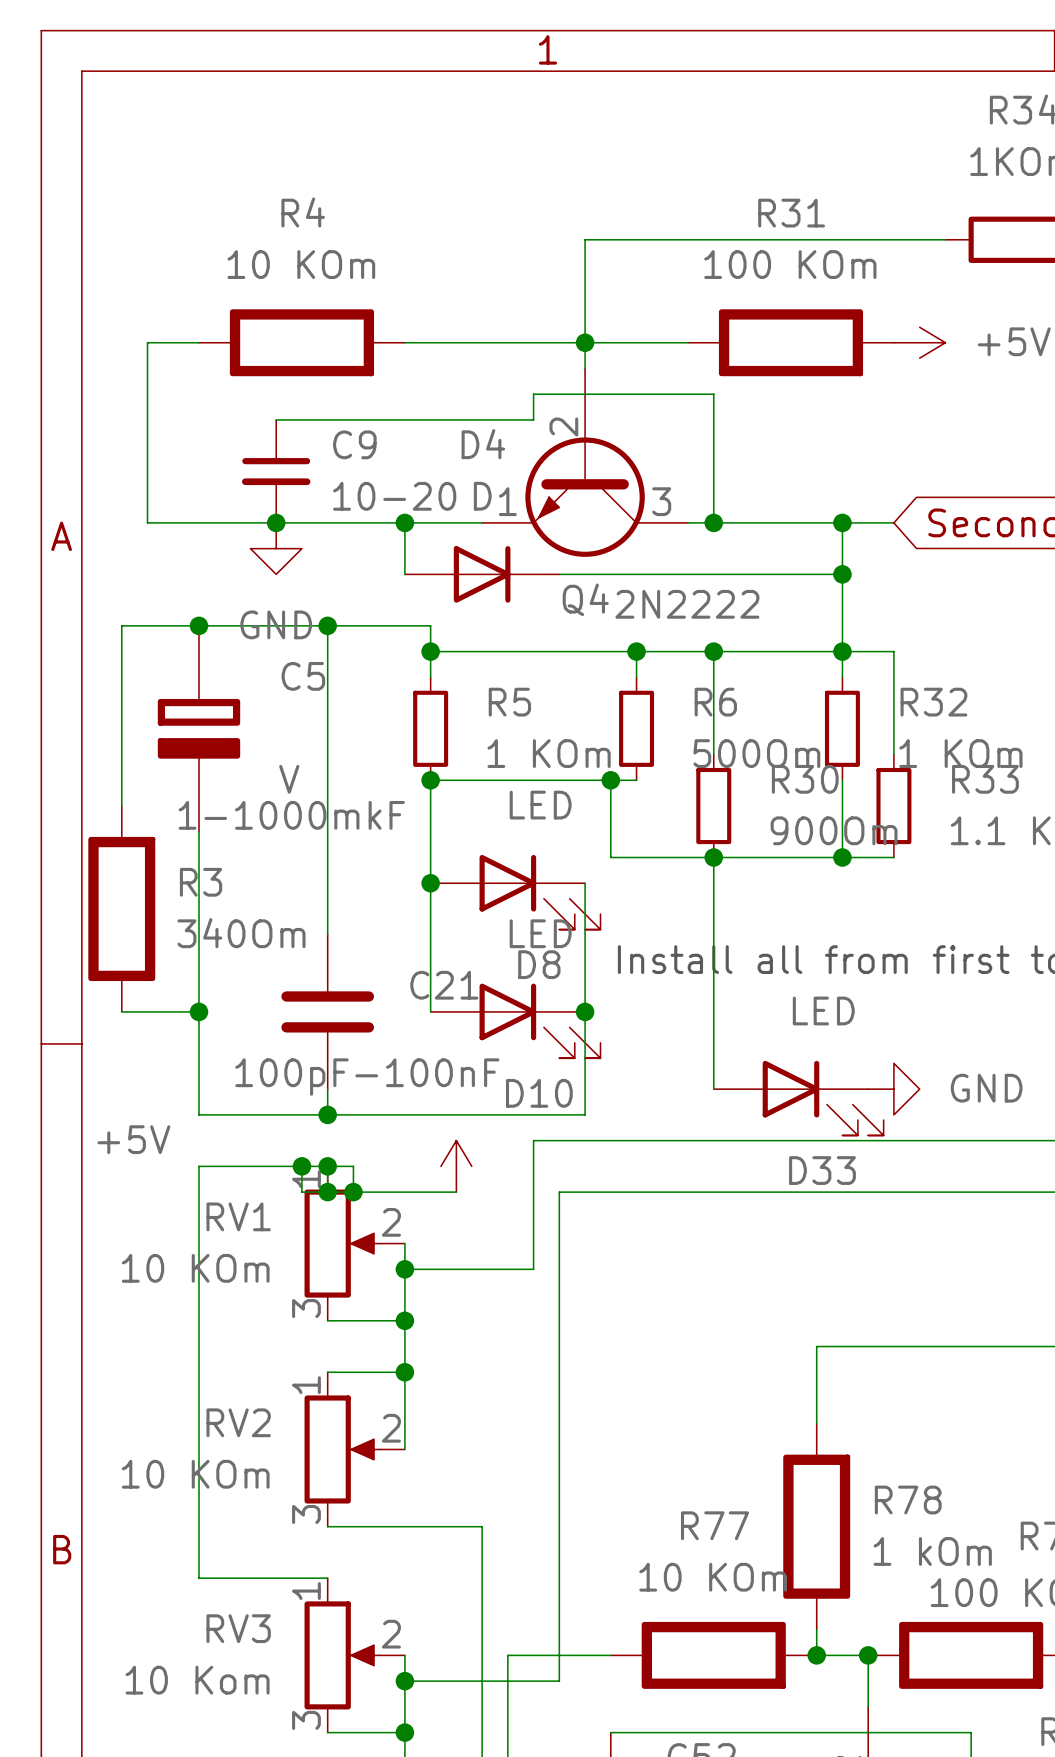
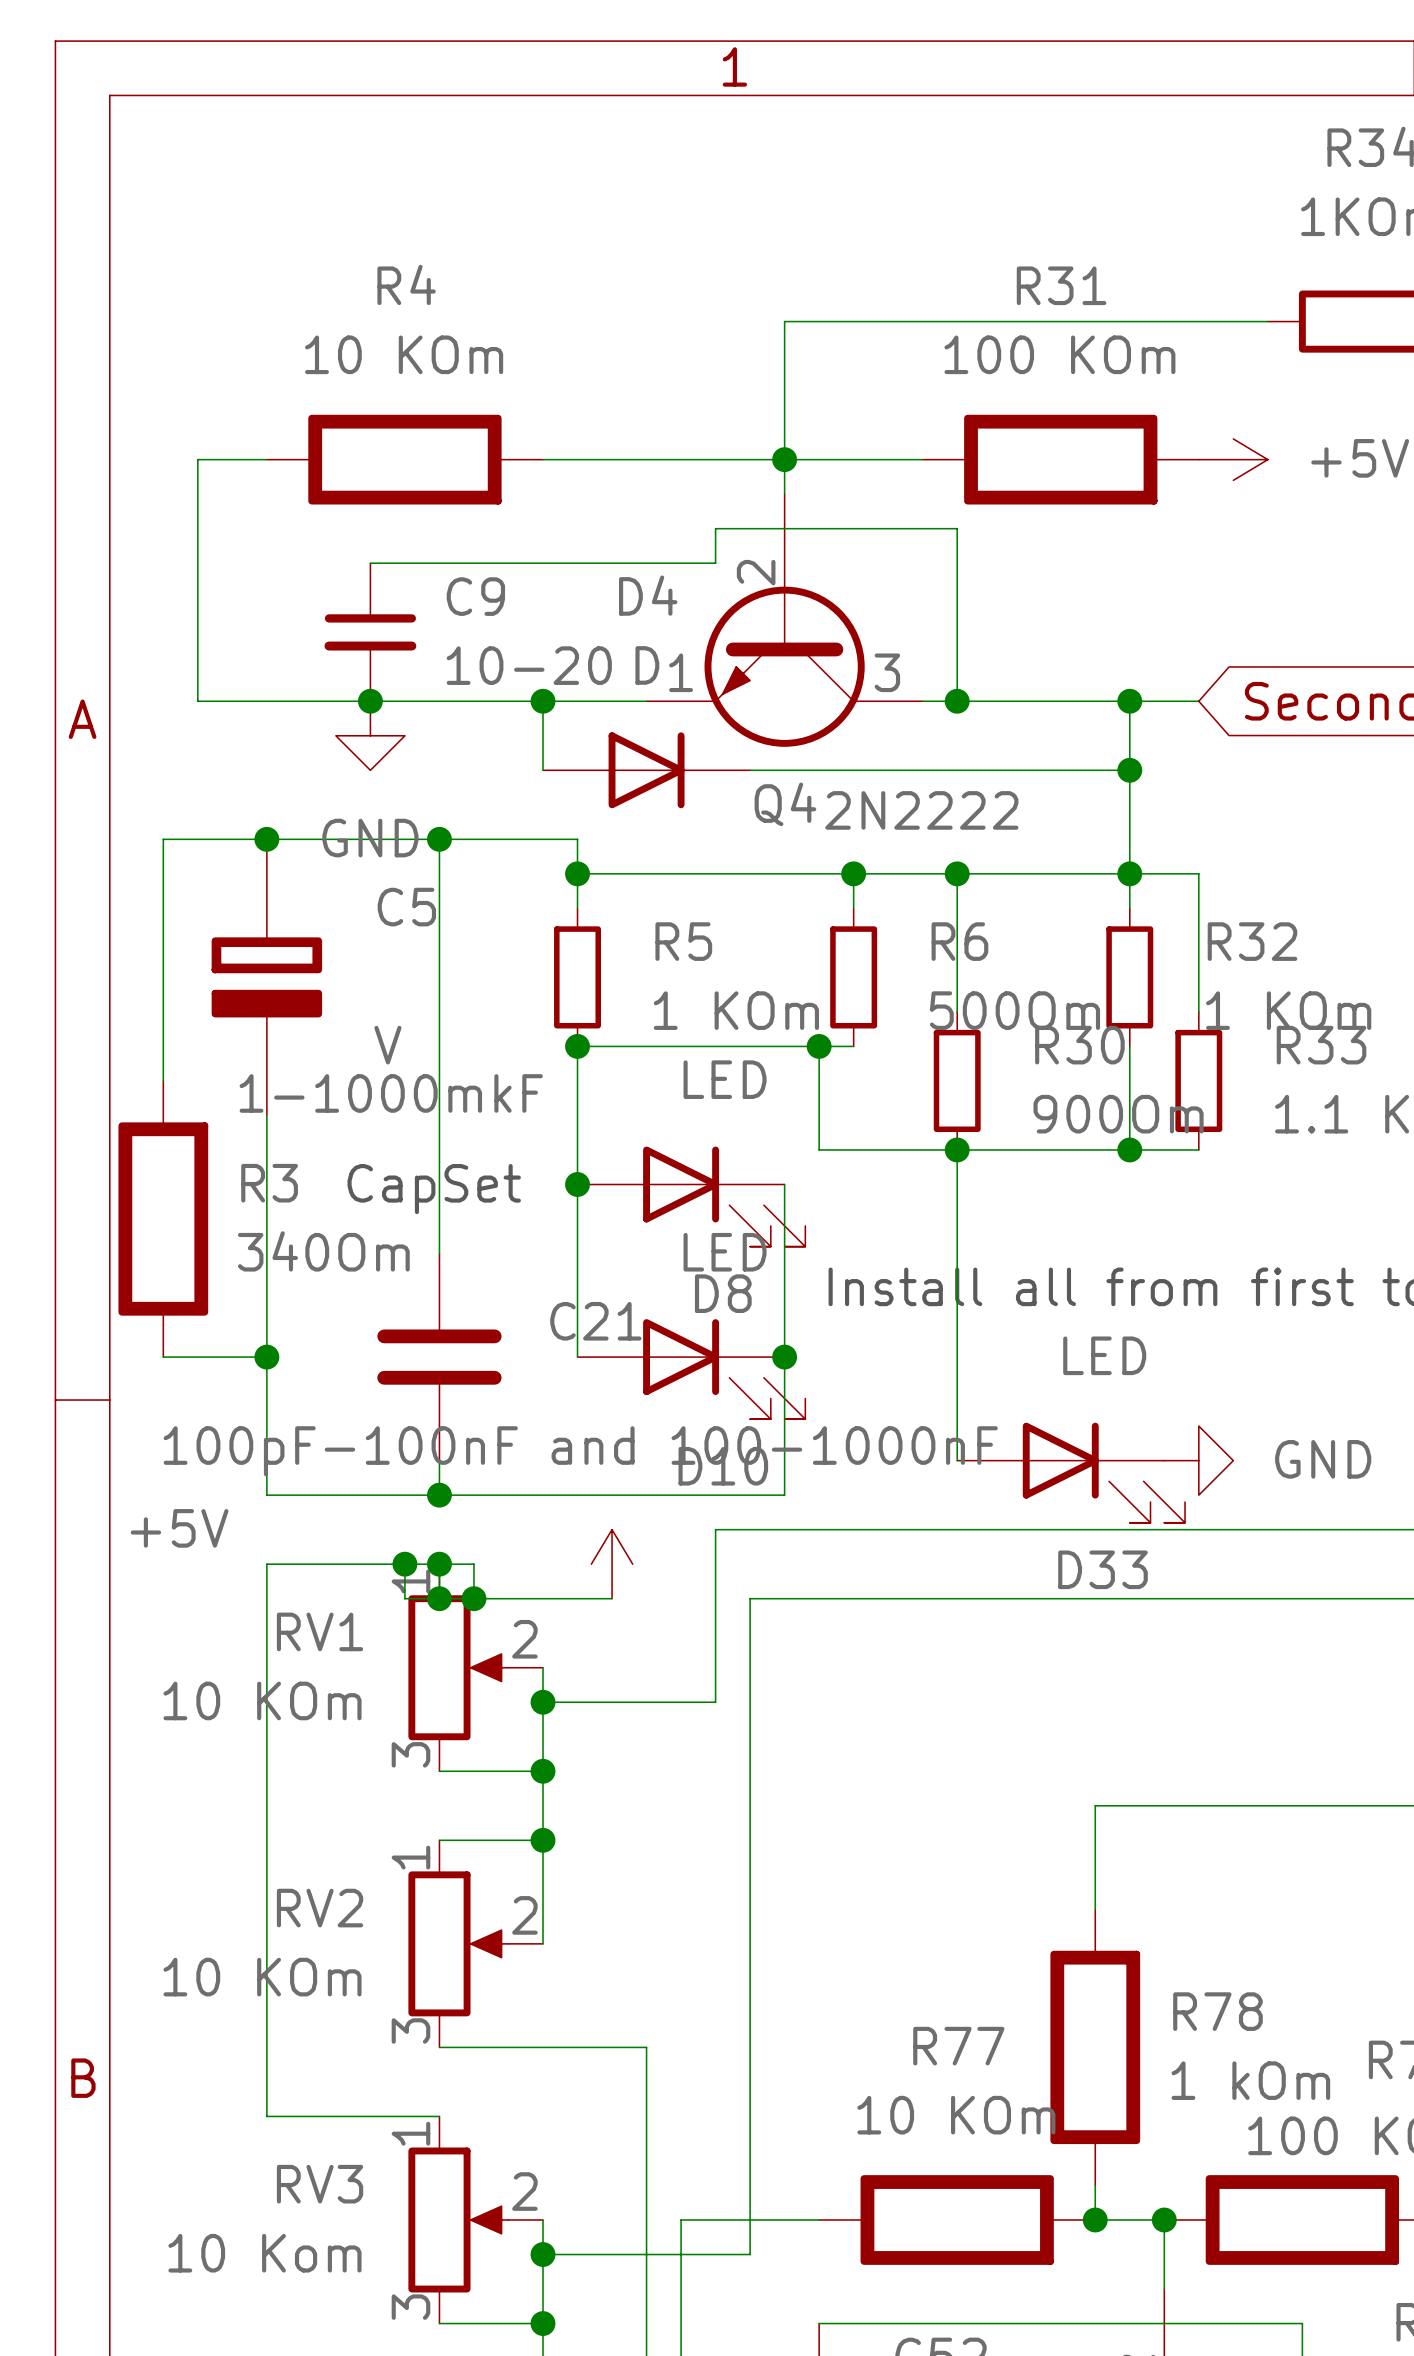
text: none -> CapSet (434, 1189)
C21 value: 100pF-100nF (367, 1077) -> 100pF-100nF and 100-1000nF (580, 1451)

